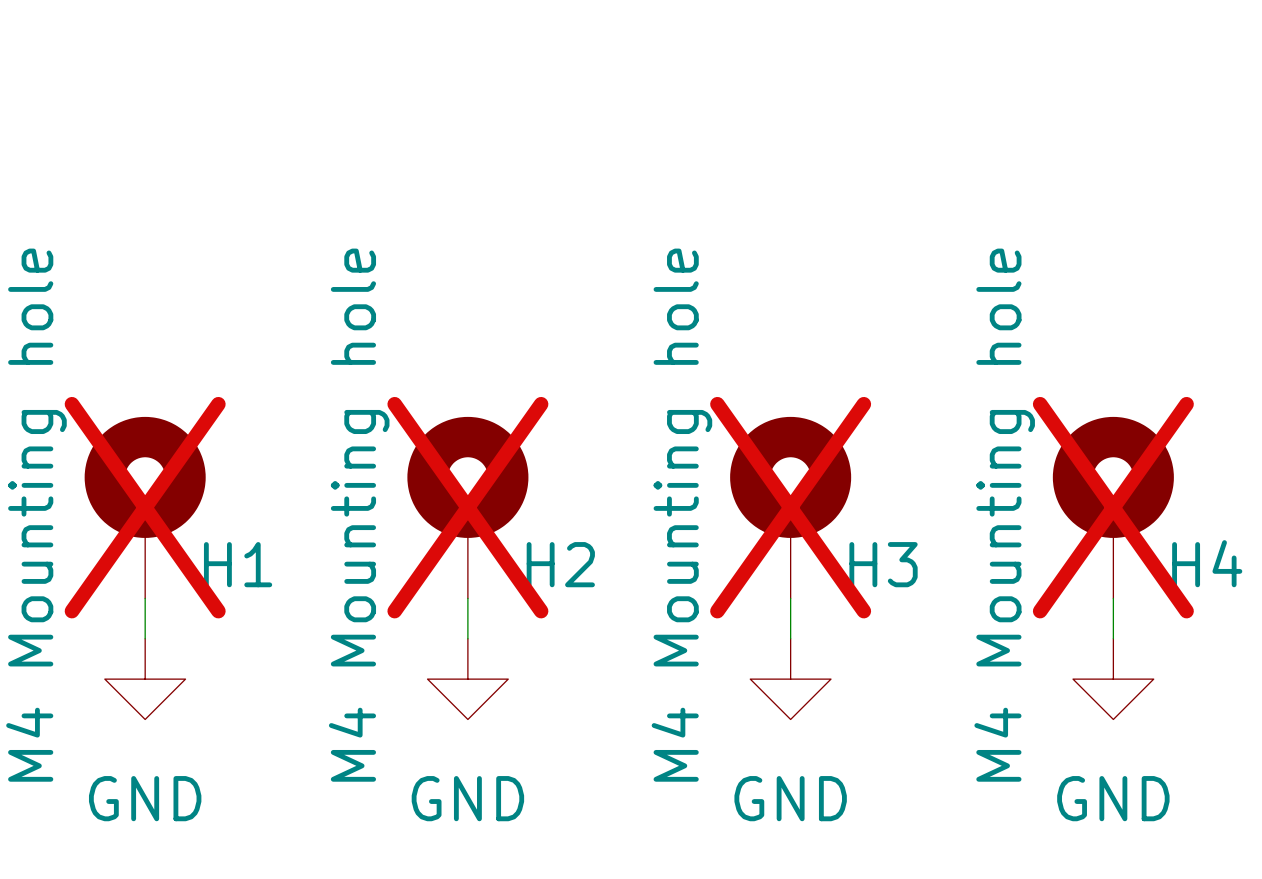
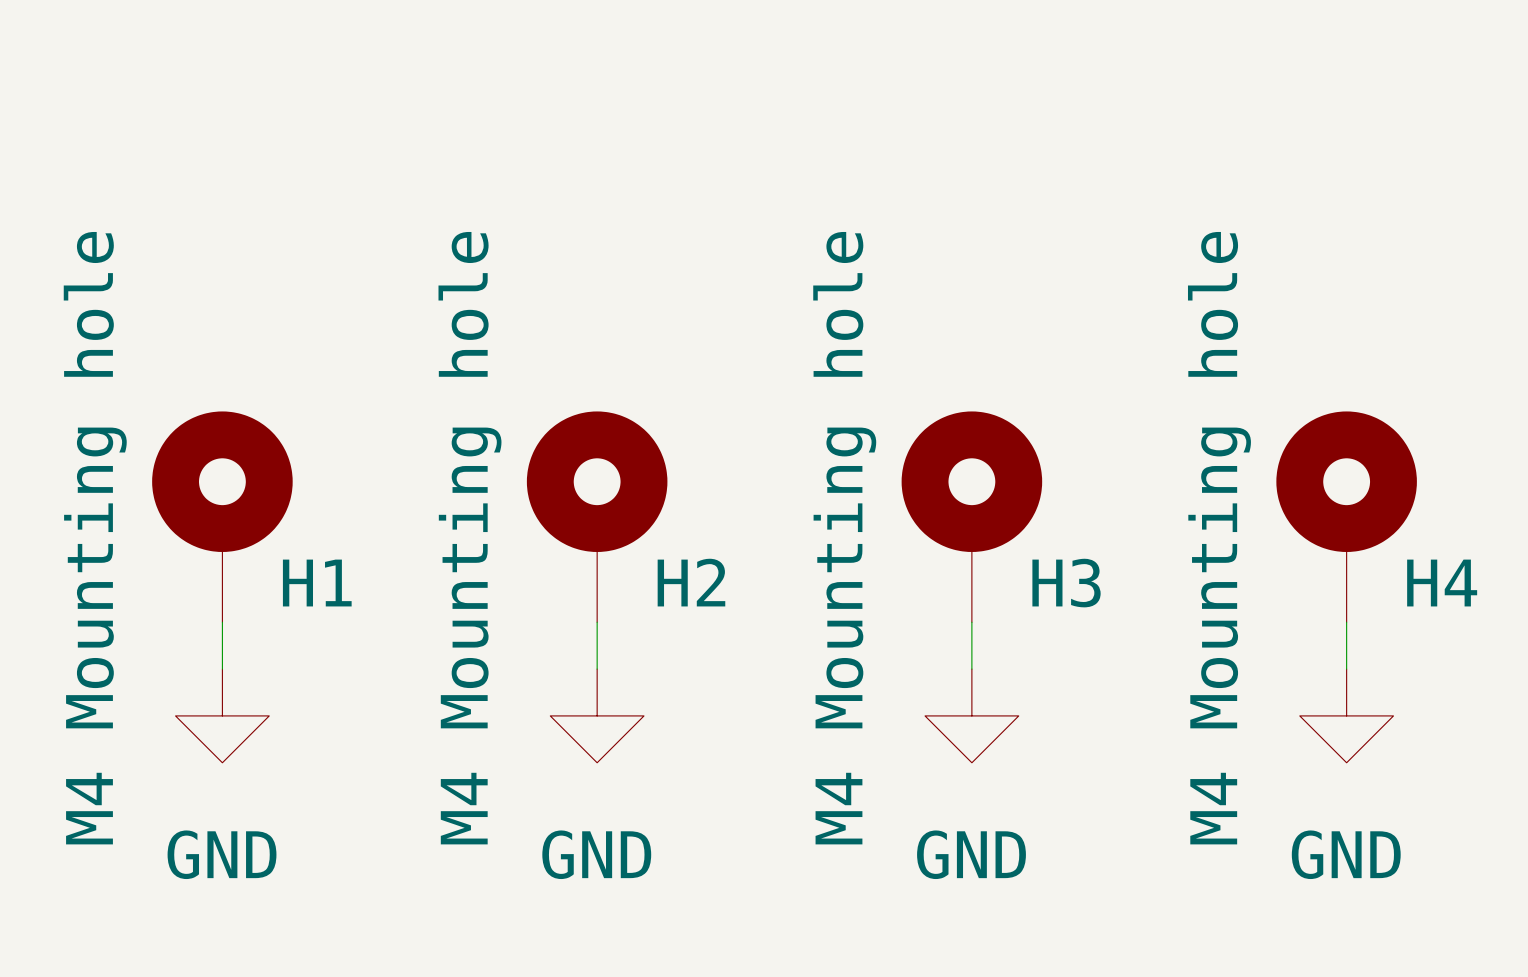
H1 do-not-place cross: (145, 507) -> none
H2 do-not-place cross: (467, 507) -> none
H3 do-not-place cross: (790, 507) -> none
H4 do-not-place cross: (1113, 507) -> none

